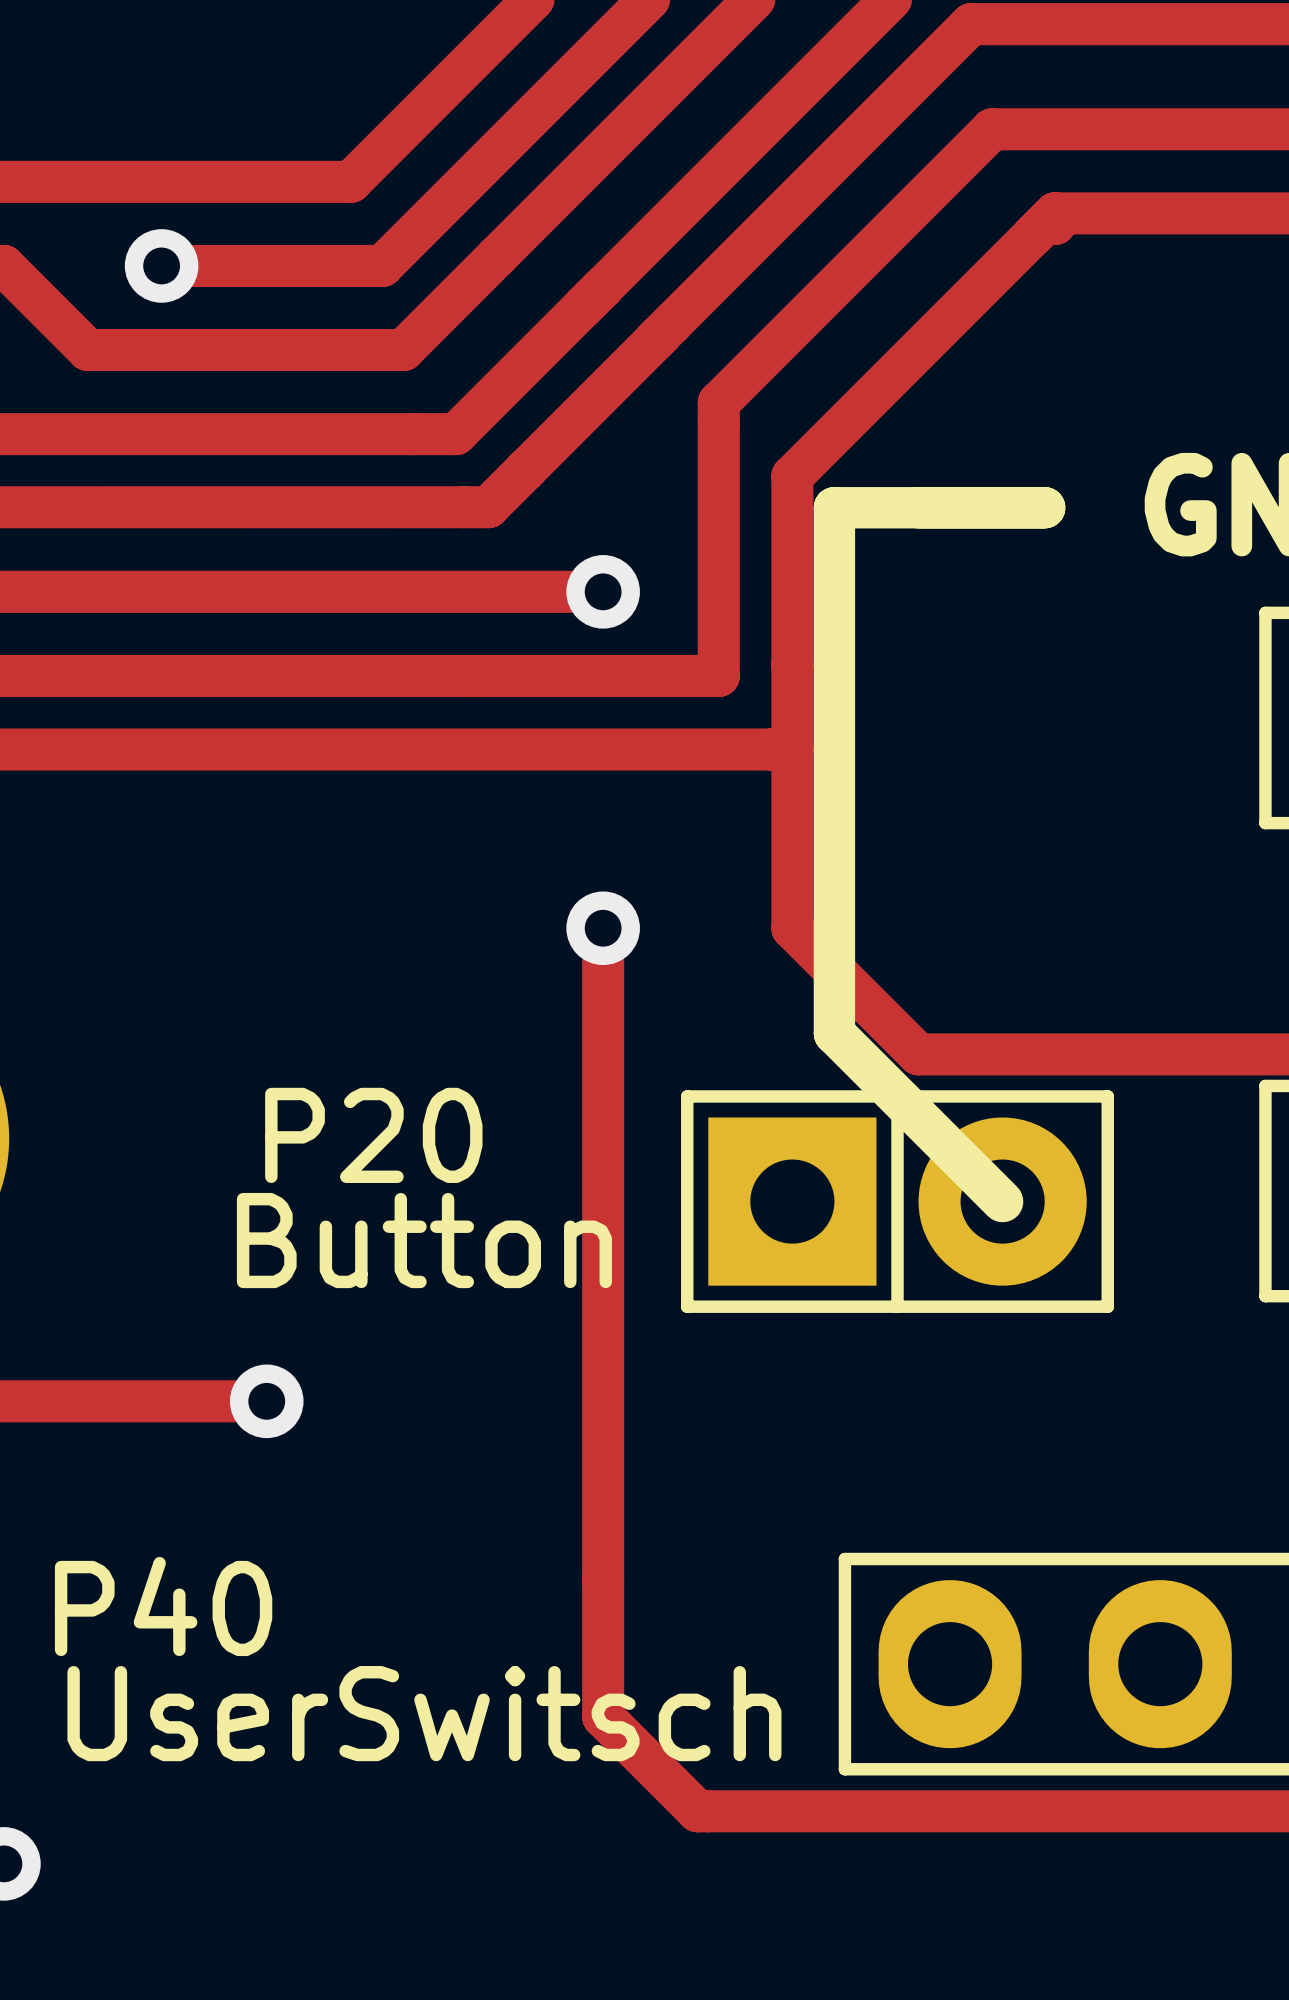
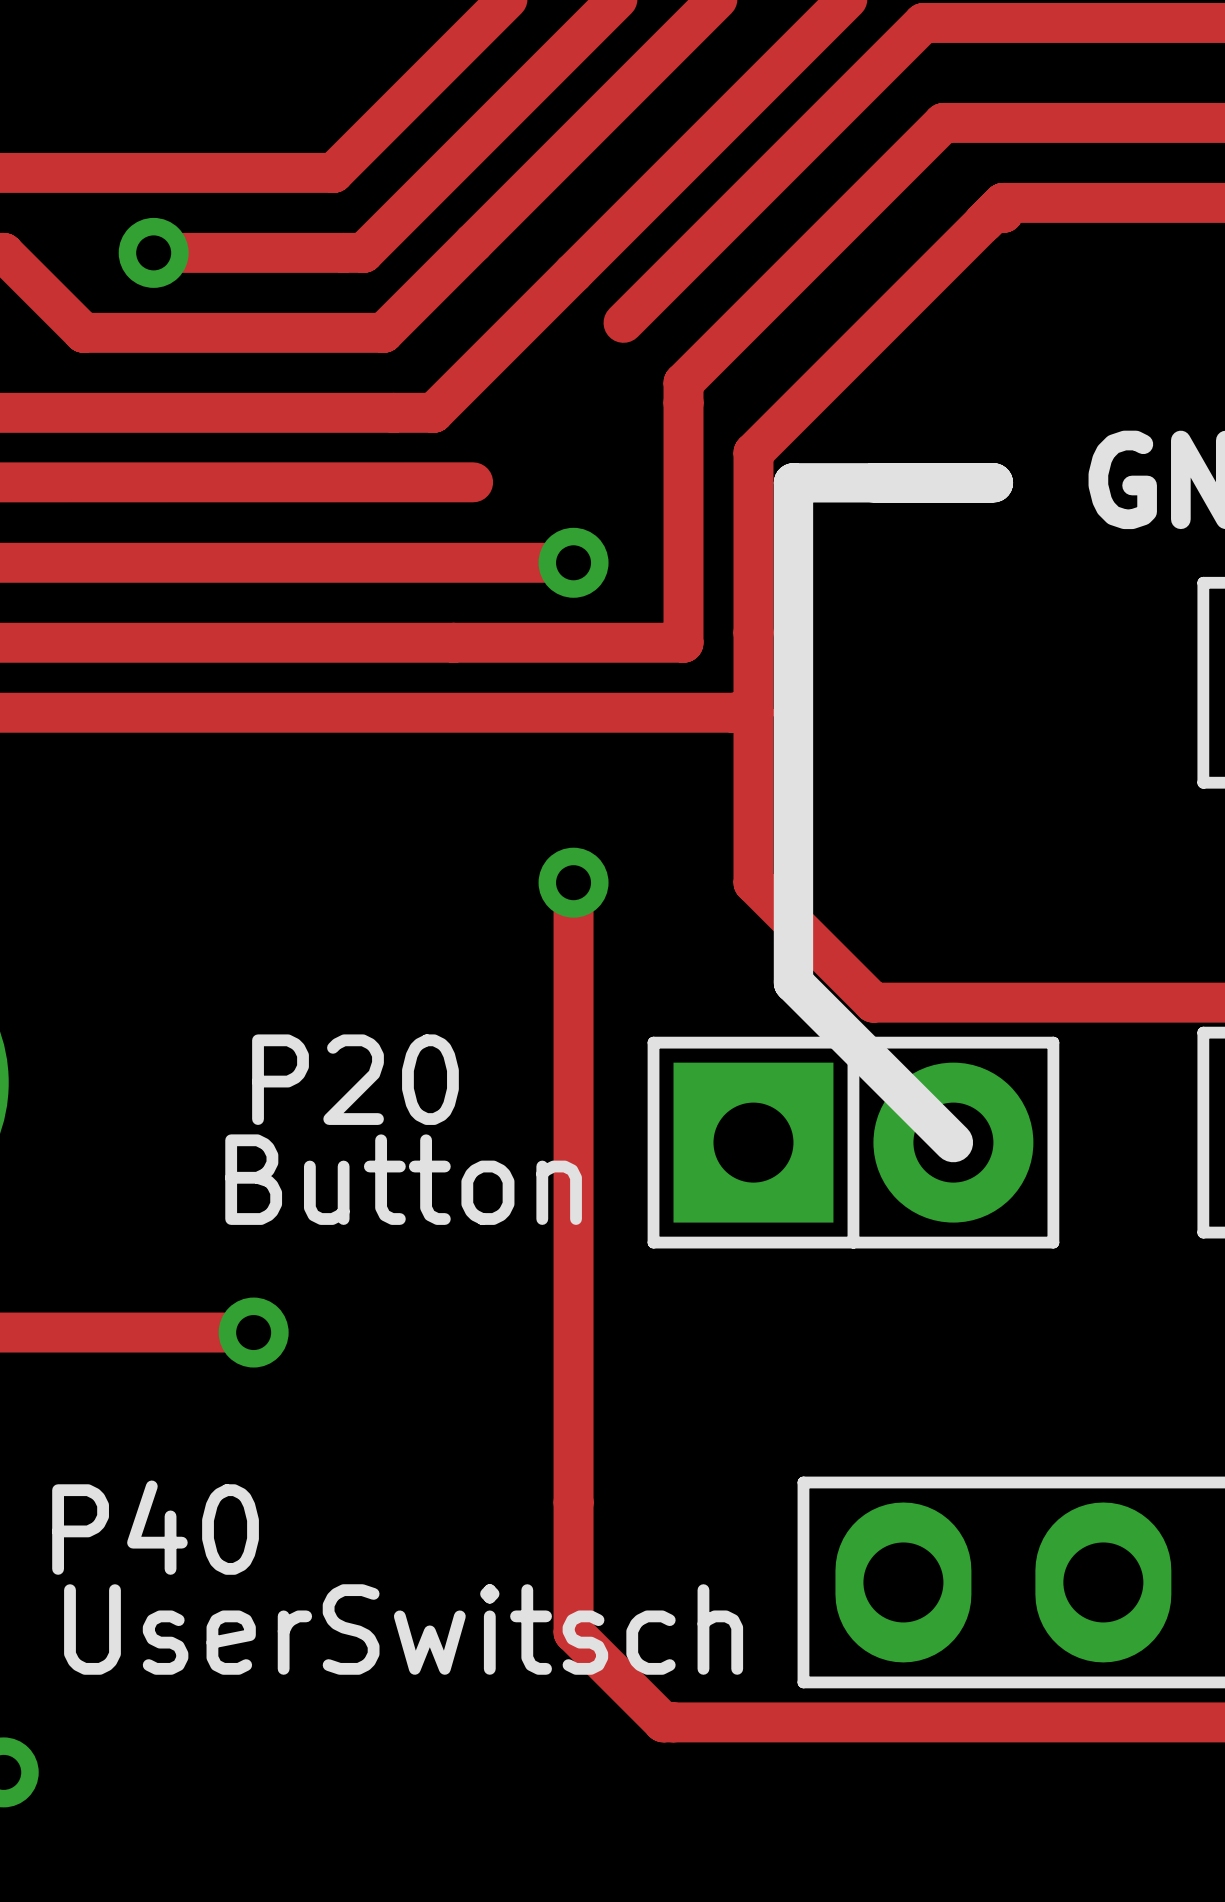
track: (660, 335) (488, 507) (463, 507) -> (473, 482) (440, 482)

